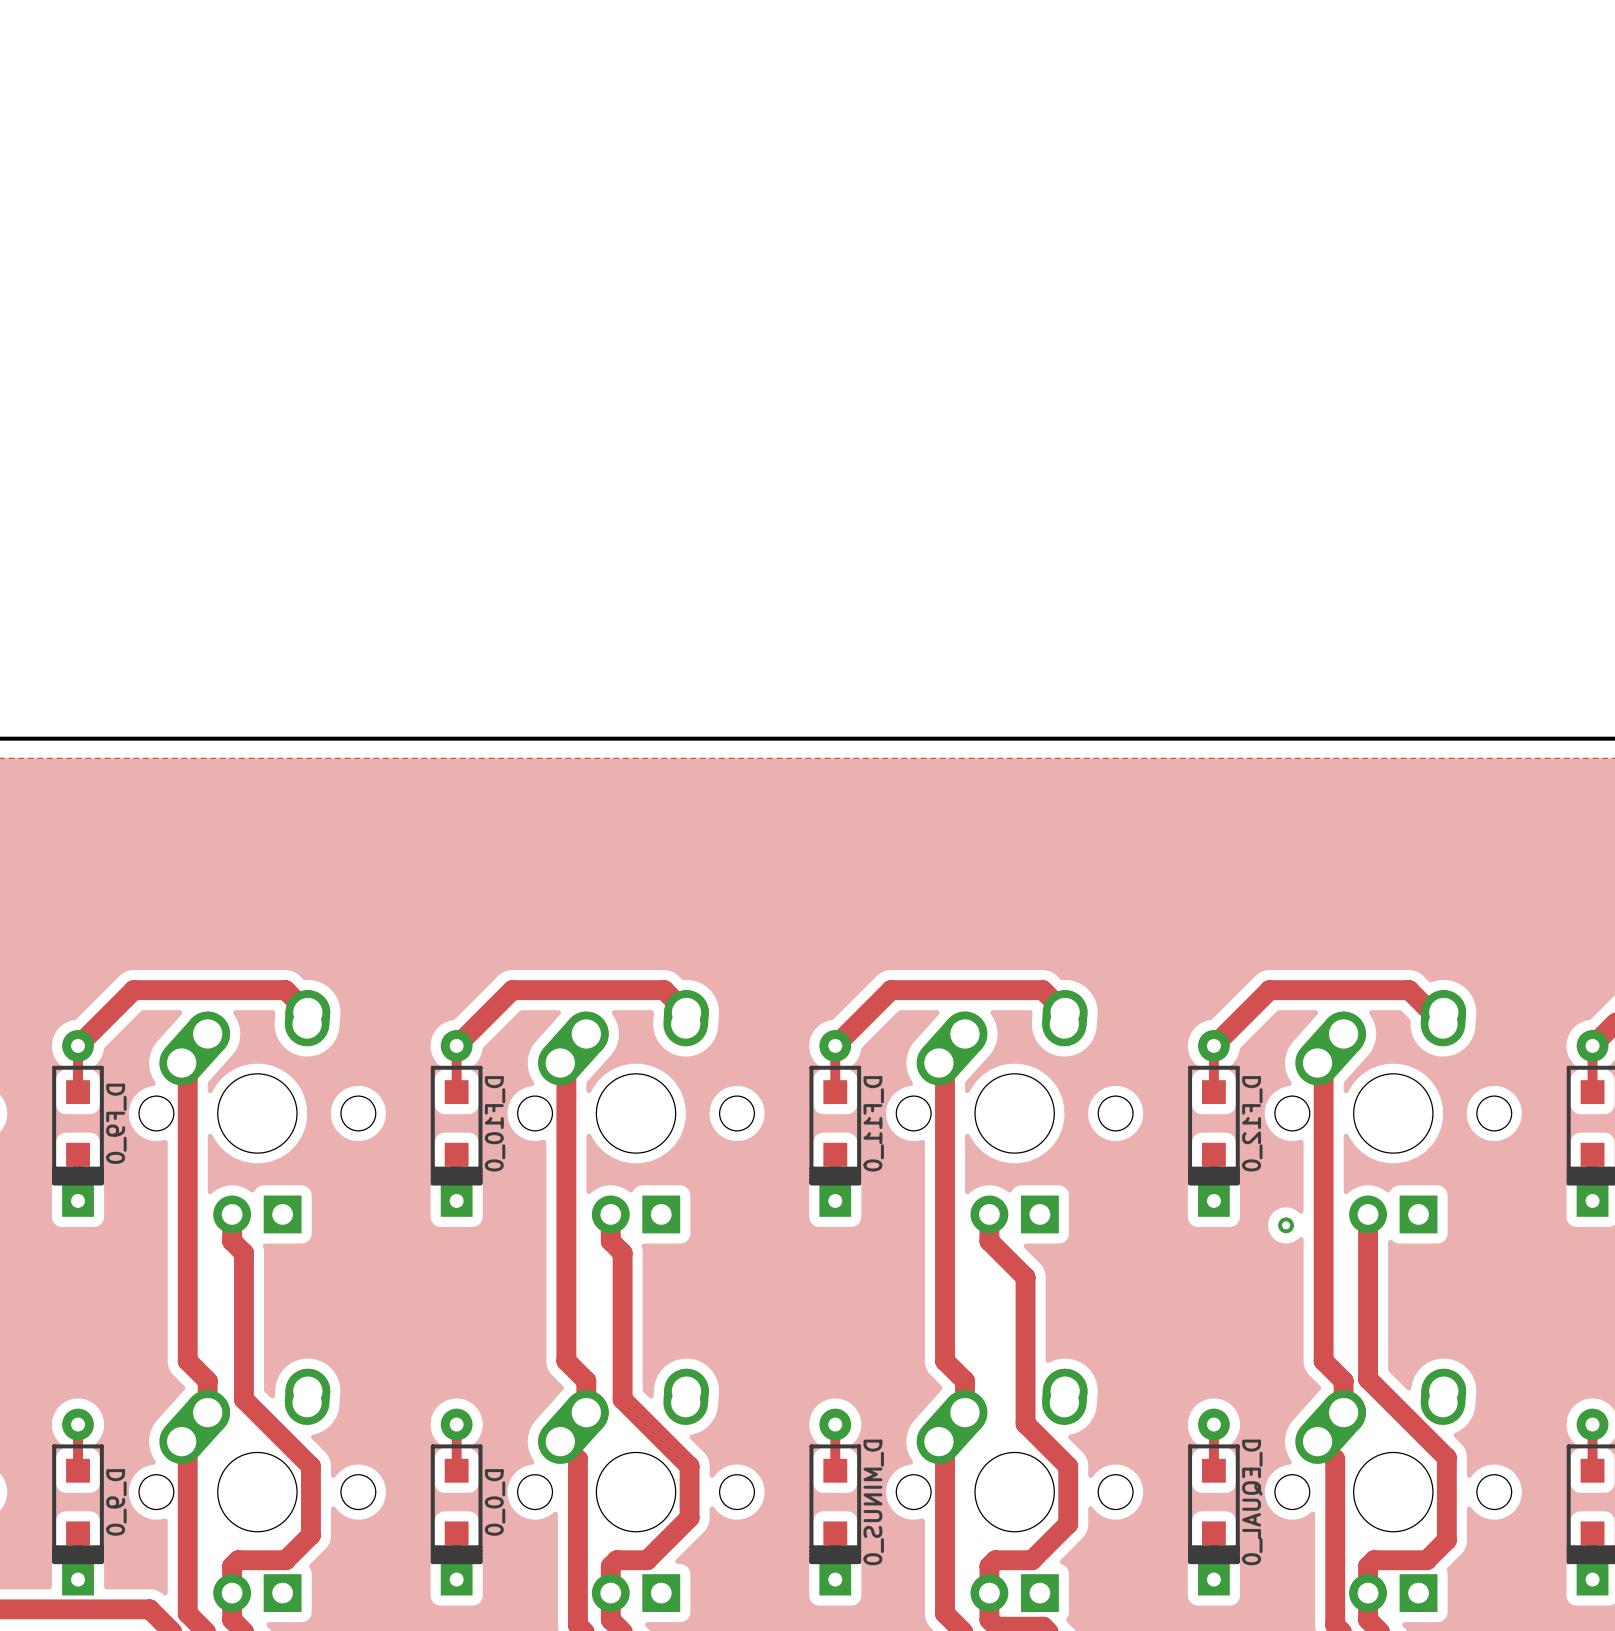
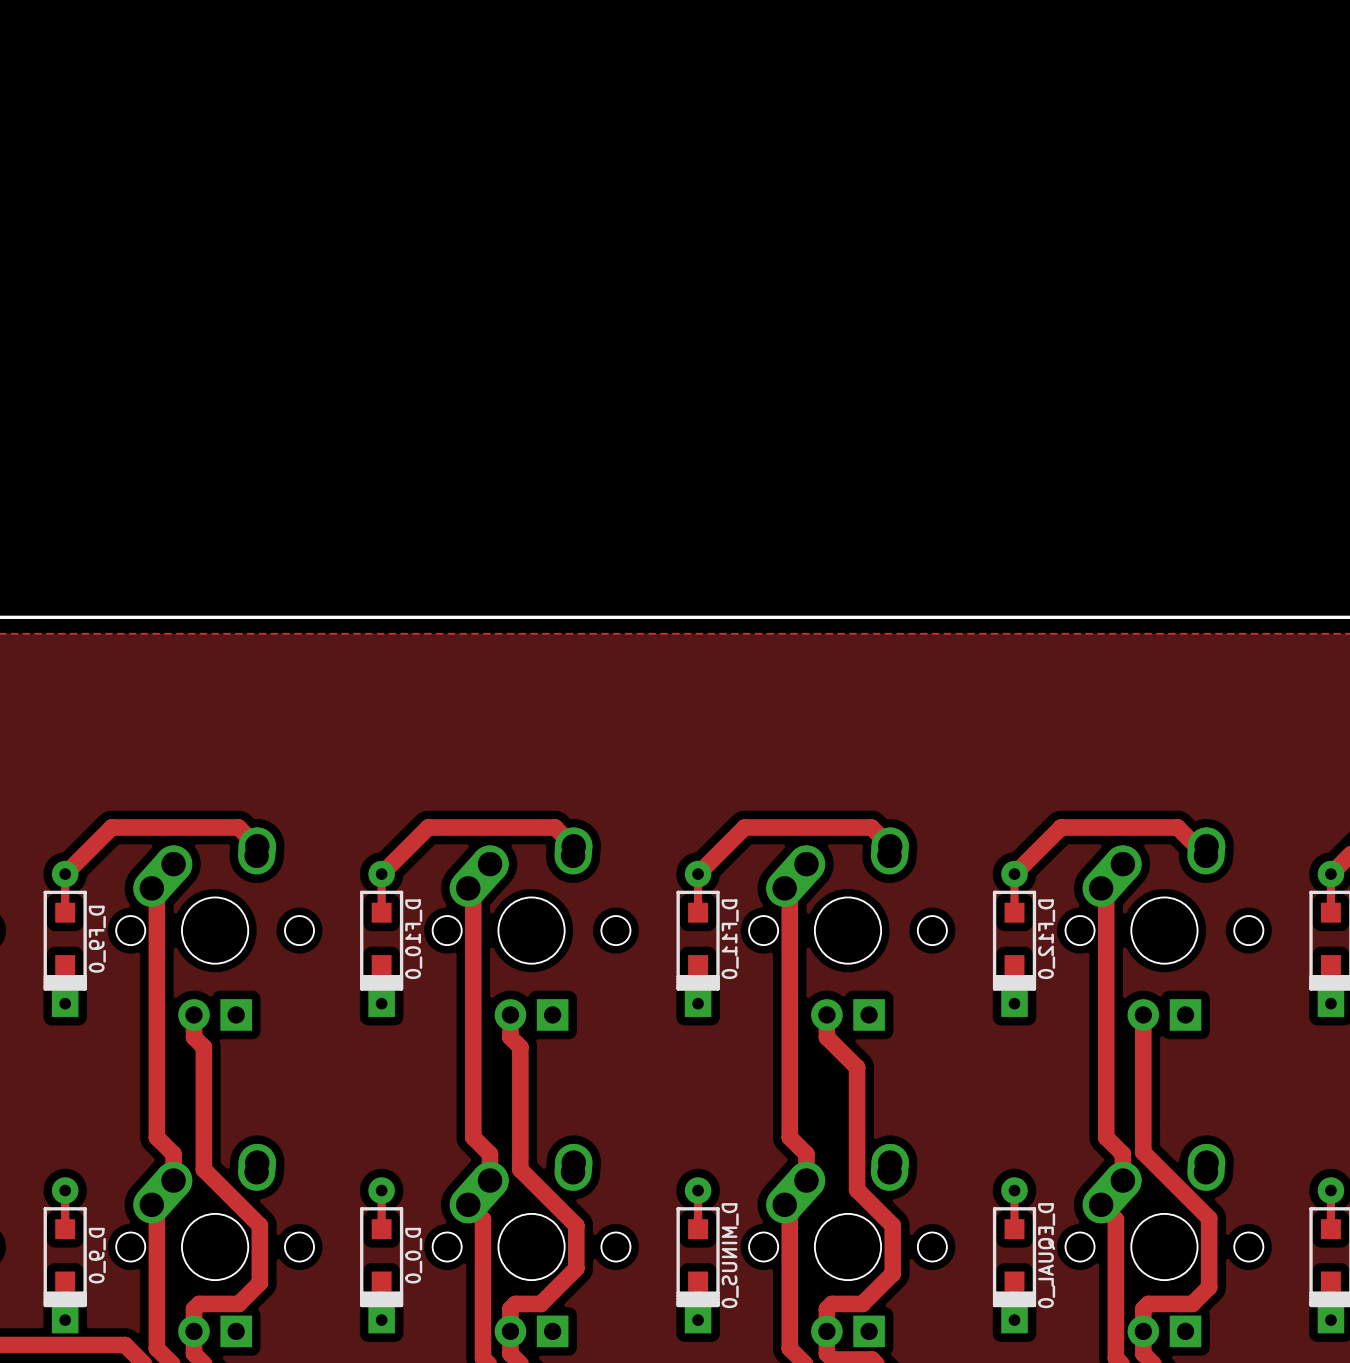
via: (1286, 1225) -> none

